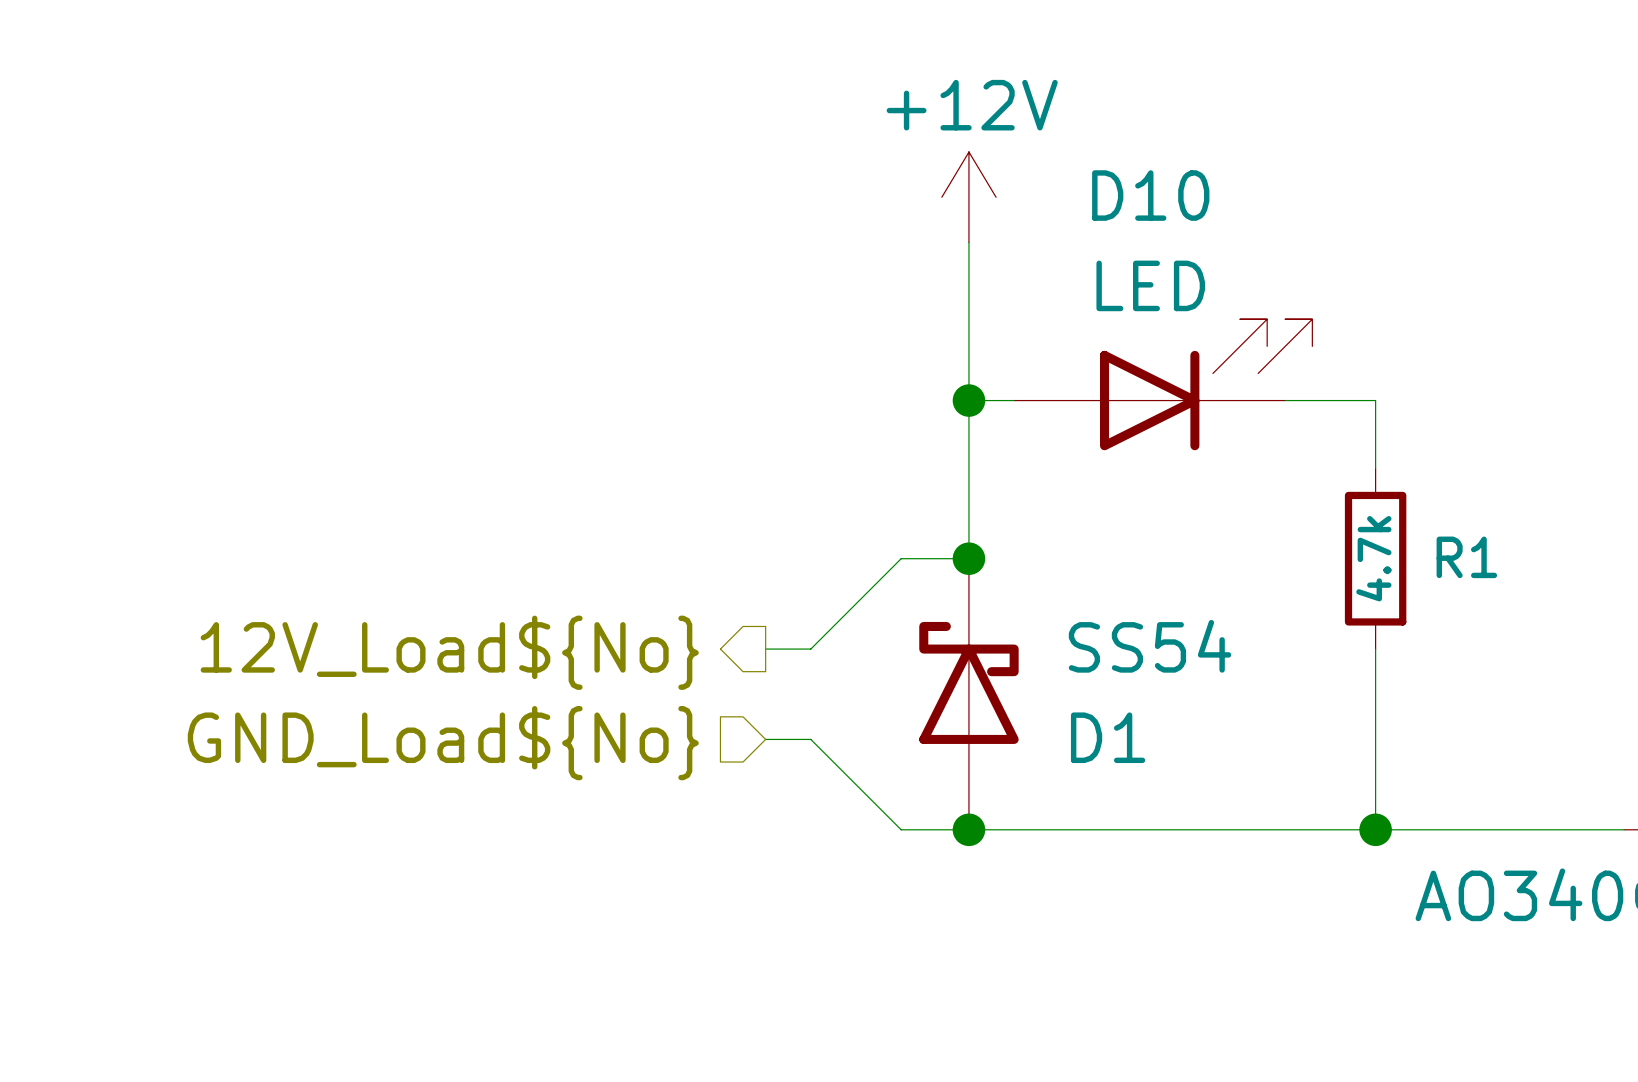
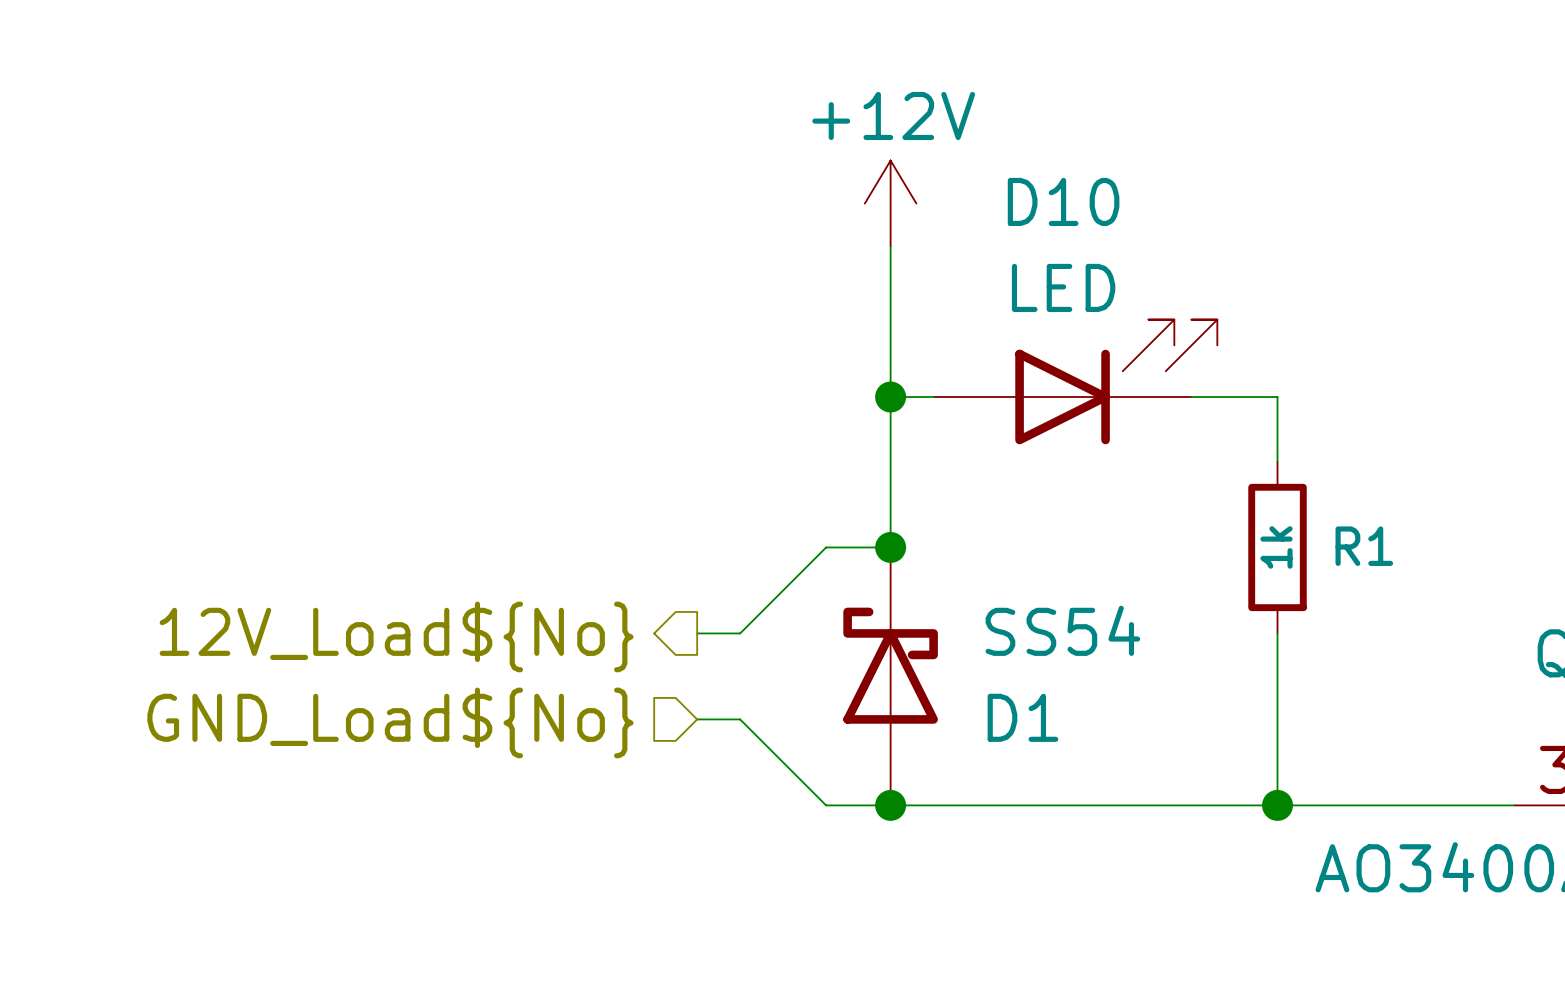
R1 value: 4.7k (1373, 558) -> 1k (1276, 547)

